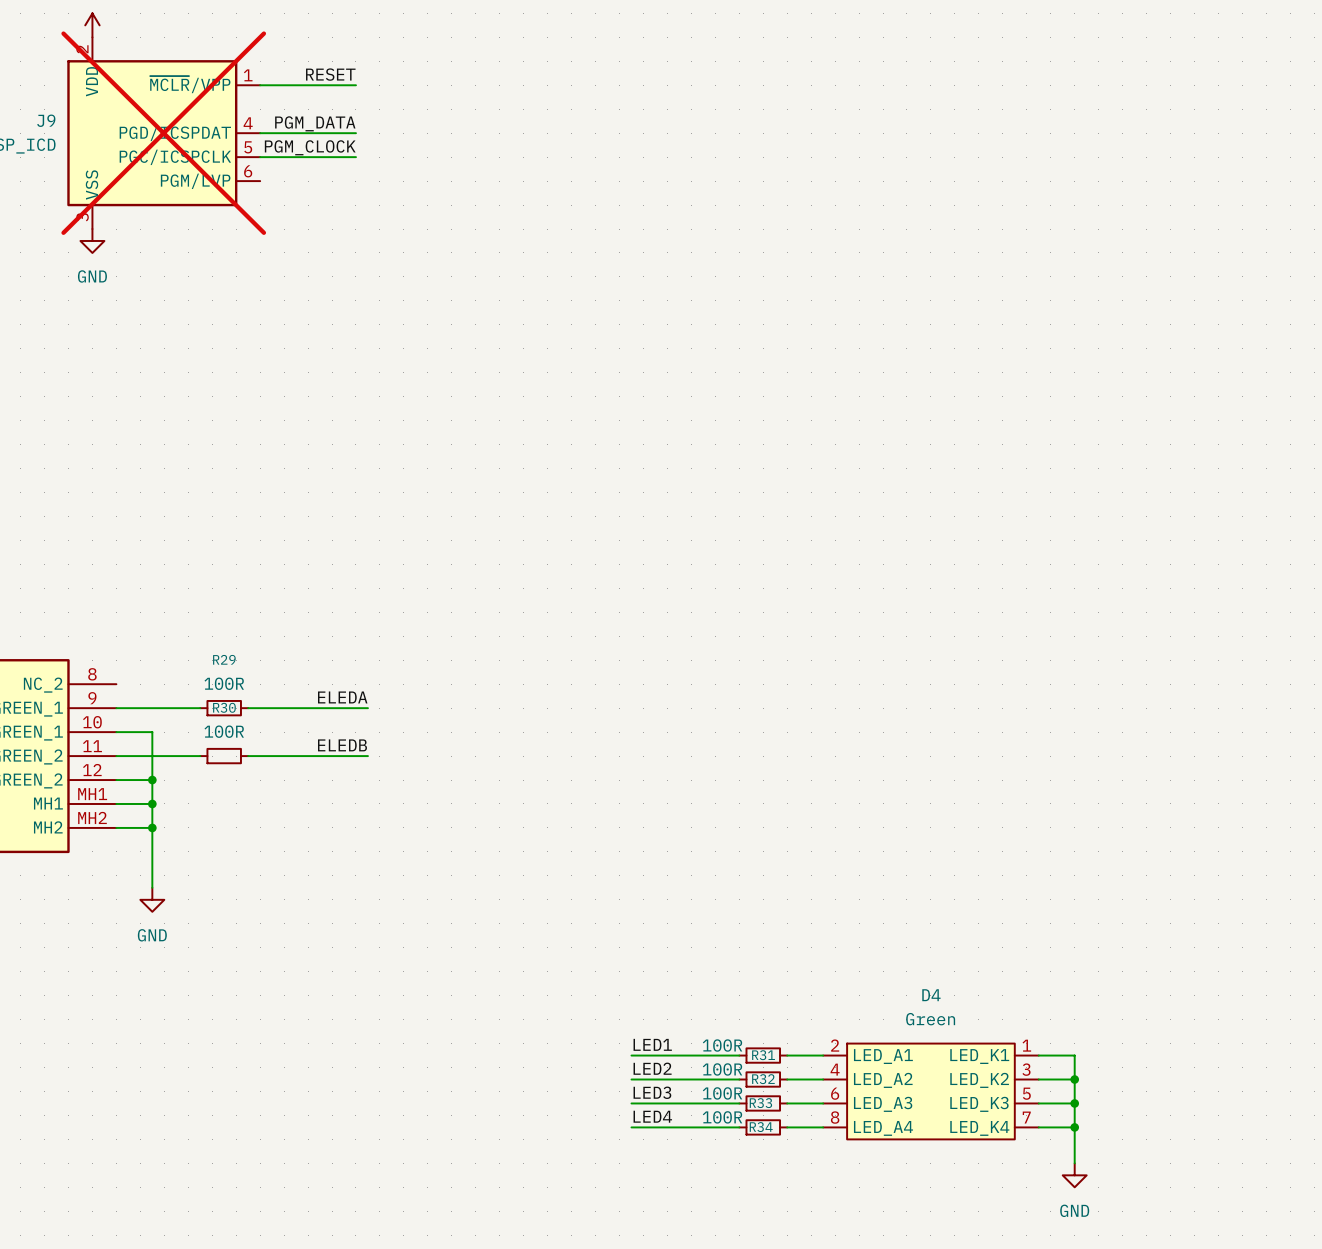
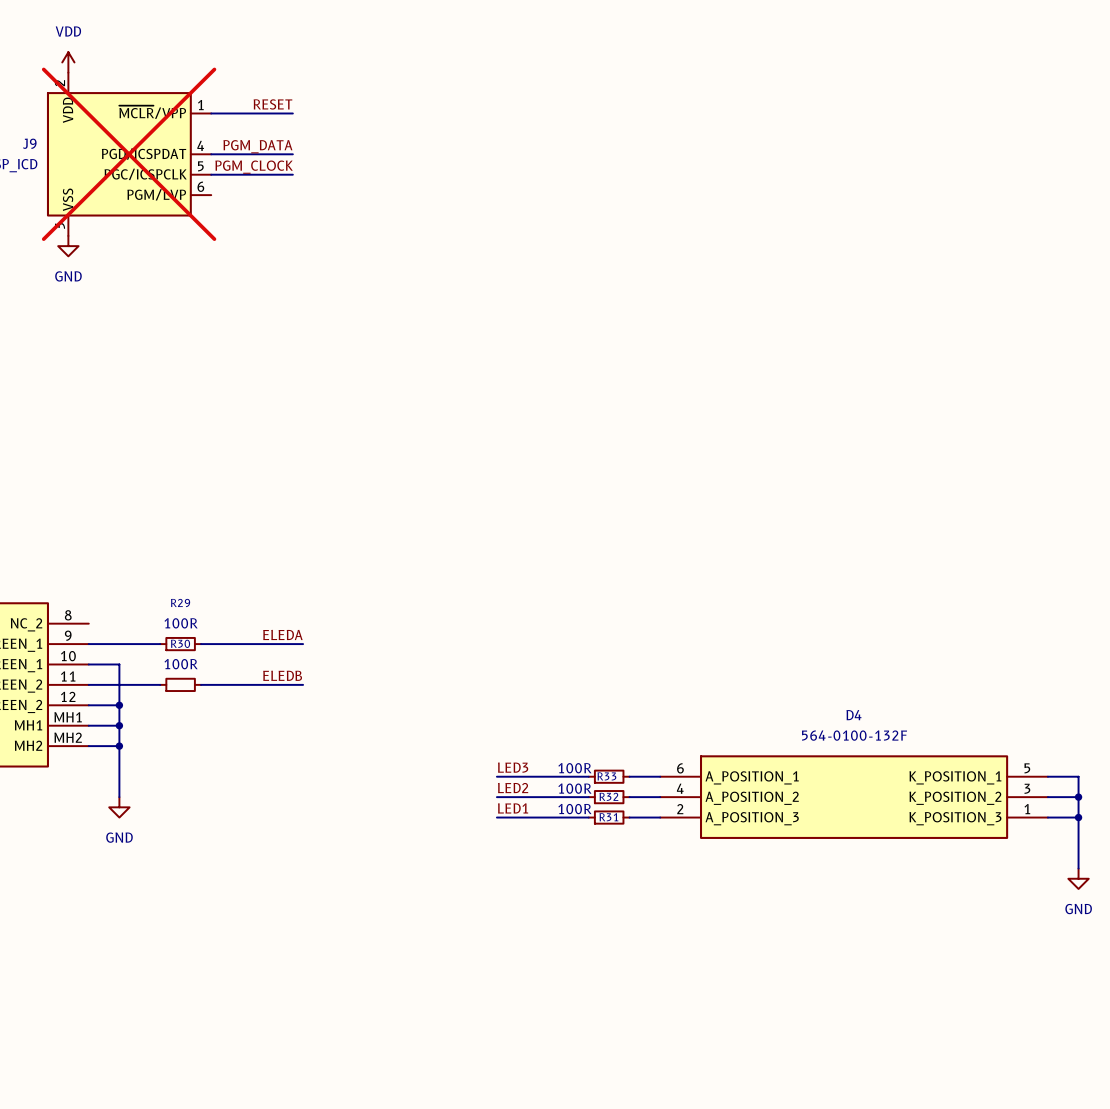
label: none -> LED3 (513, 767)
wire: none -> (1047, 776) (1078, 776) (1078, 868)
wire: none -> (1047, 797) (1078, 797)
junction: none -> (1078, 797)
wire: none -> (1047, 817) (1078, 817)
junction: none -> (1078, 817)
power symbol: none -> GND (1078, 878)
D4 value: Green (930, 1019) -> 564-0100-132F (854, 735)
D4 symbol: [823, 1043, 1039, 1140] -> [660, 755, 1048, 839]
label position: LED1 (652, 1044) -> LED1 (513, 808)
wire: (631, 1055) (739, 1055) -> (496, 776) (588, 776)
R31 position: (763, 1055) -> (609, 817)
wire: (787, 1055) (823, 1055) -> (629, 776) (660, 776)
wire: (1038, 1055) (1074, 1055) (1074, 1163) -> none
label position: LED2 (652, 1068) -> LED2 (513, 788)
wire: (631, 1079) (739, 1079) -> (496, 797) (588, 797)
R32 position: (763, 1079) -> (609, 797)
wire: (787, 1079) (823, 1079) -> (629, 797) (660, 797)
wire: (1038, 1079) (1074, 1079) -> none
junction: (1074, 1079) -> none
label: LED3 (652, 1092) -> none
wire: (631, 1103) (739, 1103) -> (496, 817) (588, 817)
R33 position: (763, 1103) -> (609, 776)
wire: (787, 1103) (823, 1103) -> (629, 817) (660, 817)
wire: (1038, 1103) (1074, 1103) -> none
junction: (1074, 1103) -> none
label: LED4 (652, 1116) -> none
wire: (631, 1127) (739, 1127) -> none
R34: 100R (763, 1127) -> none
wire: (787, 1127) (823, 1127) -> none
wire: (1038, 1127) (1074, 1127) -> none
junction: (1074, 1127) -> none
power symbol: GND (1074, 1175) -> none

